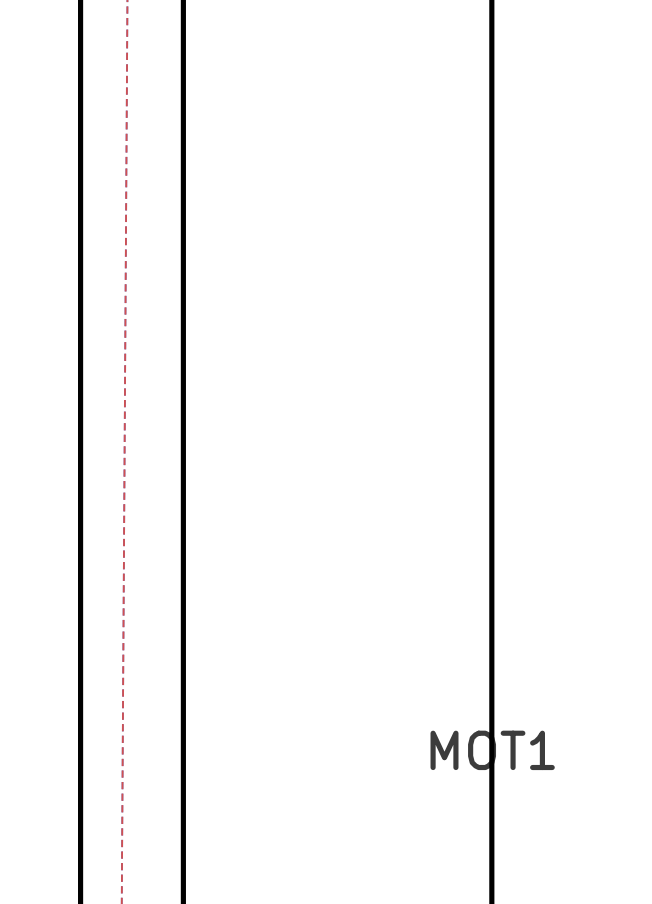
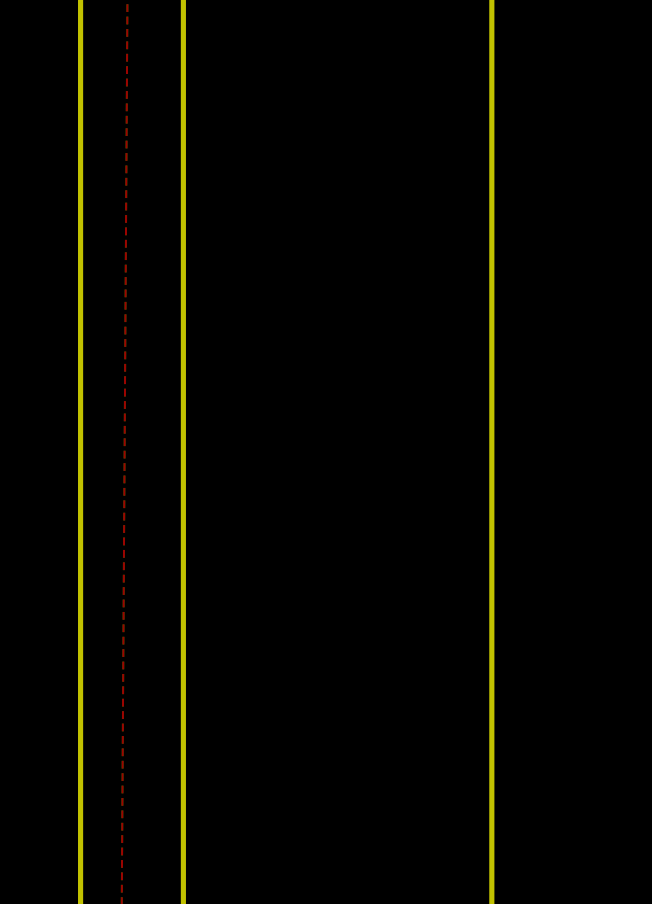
MOT1: (492, 750) -> none

